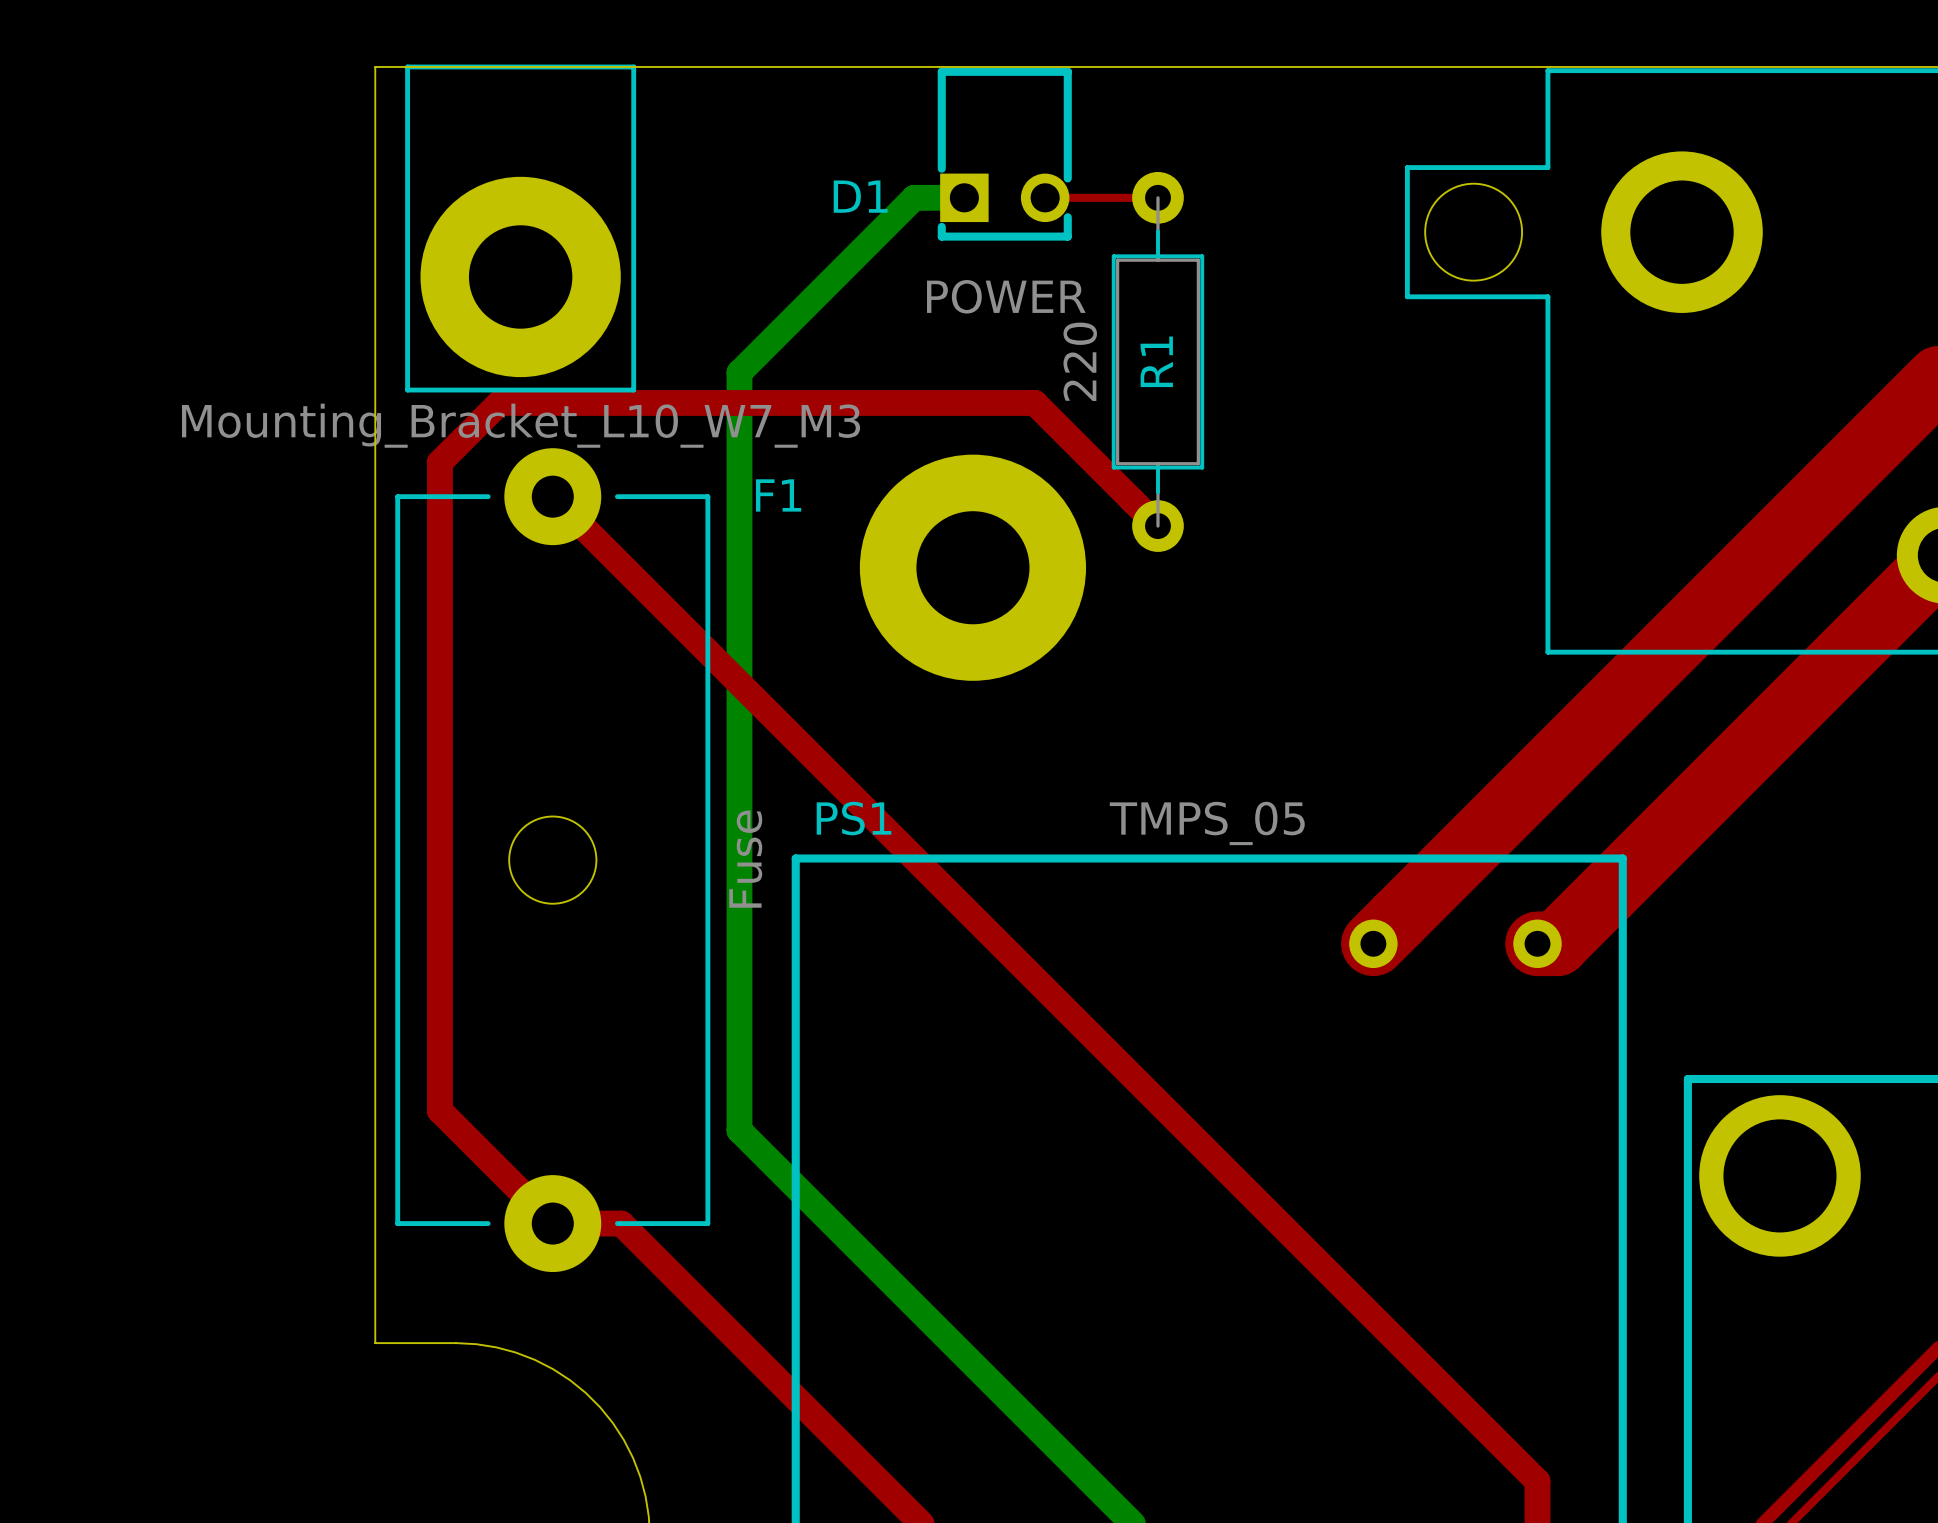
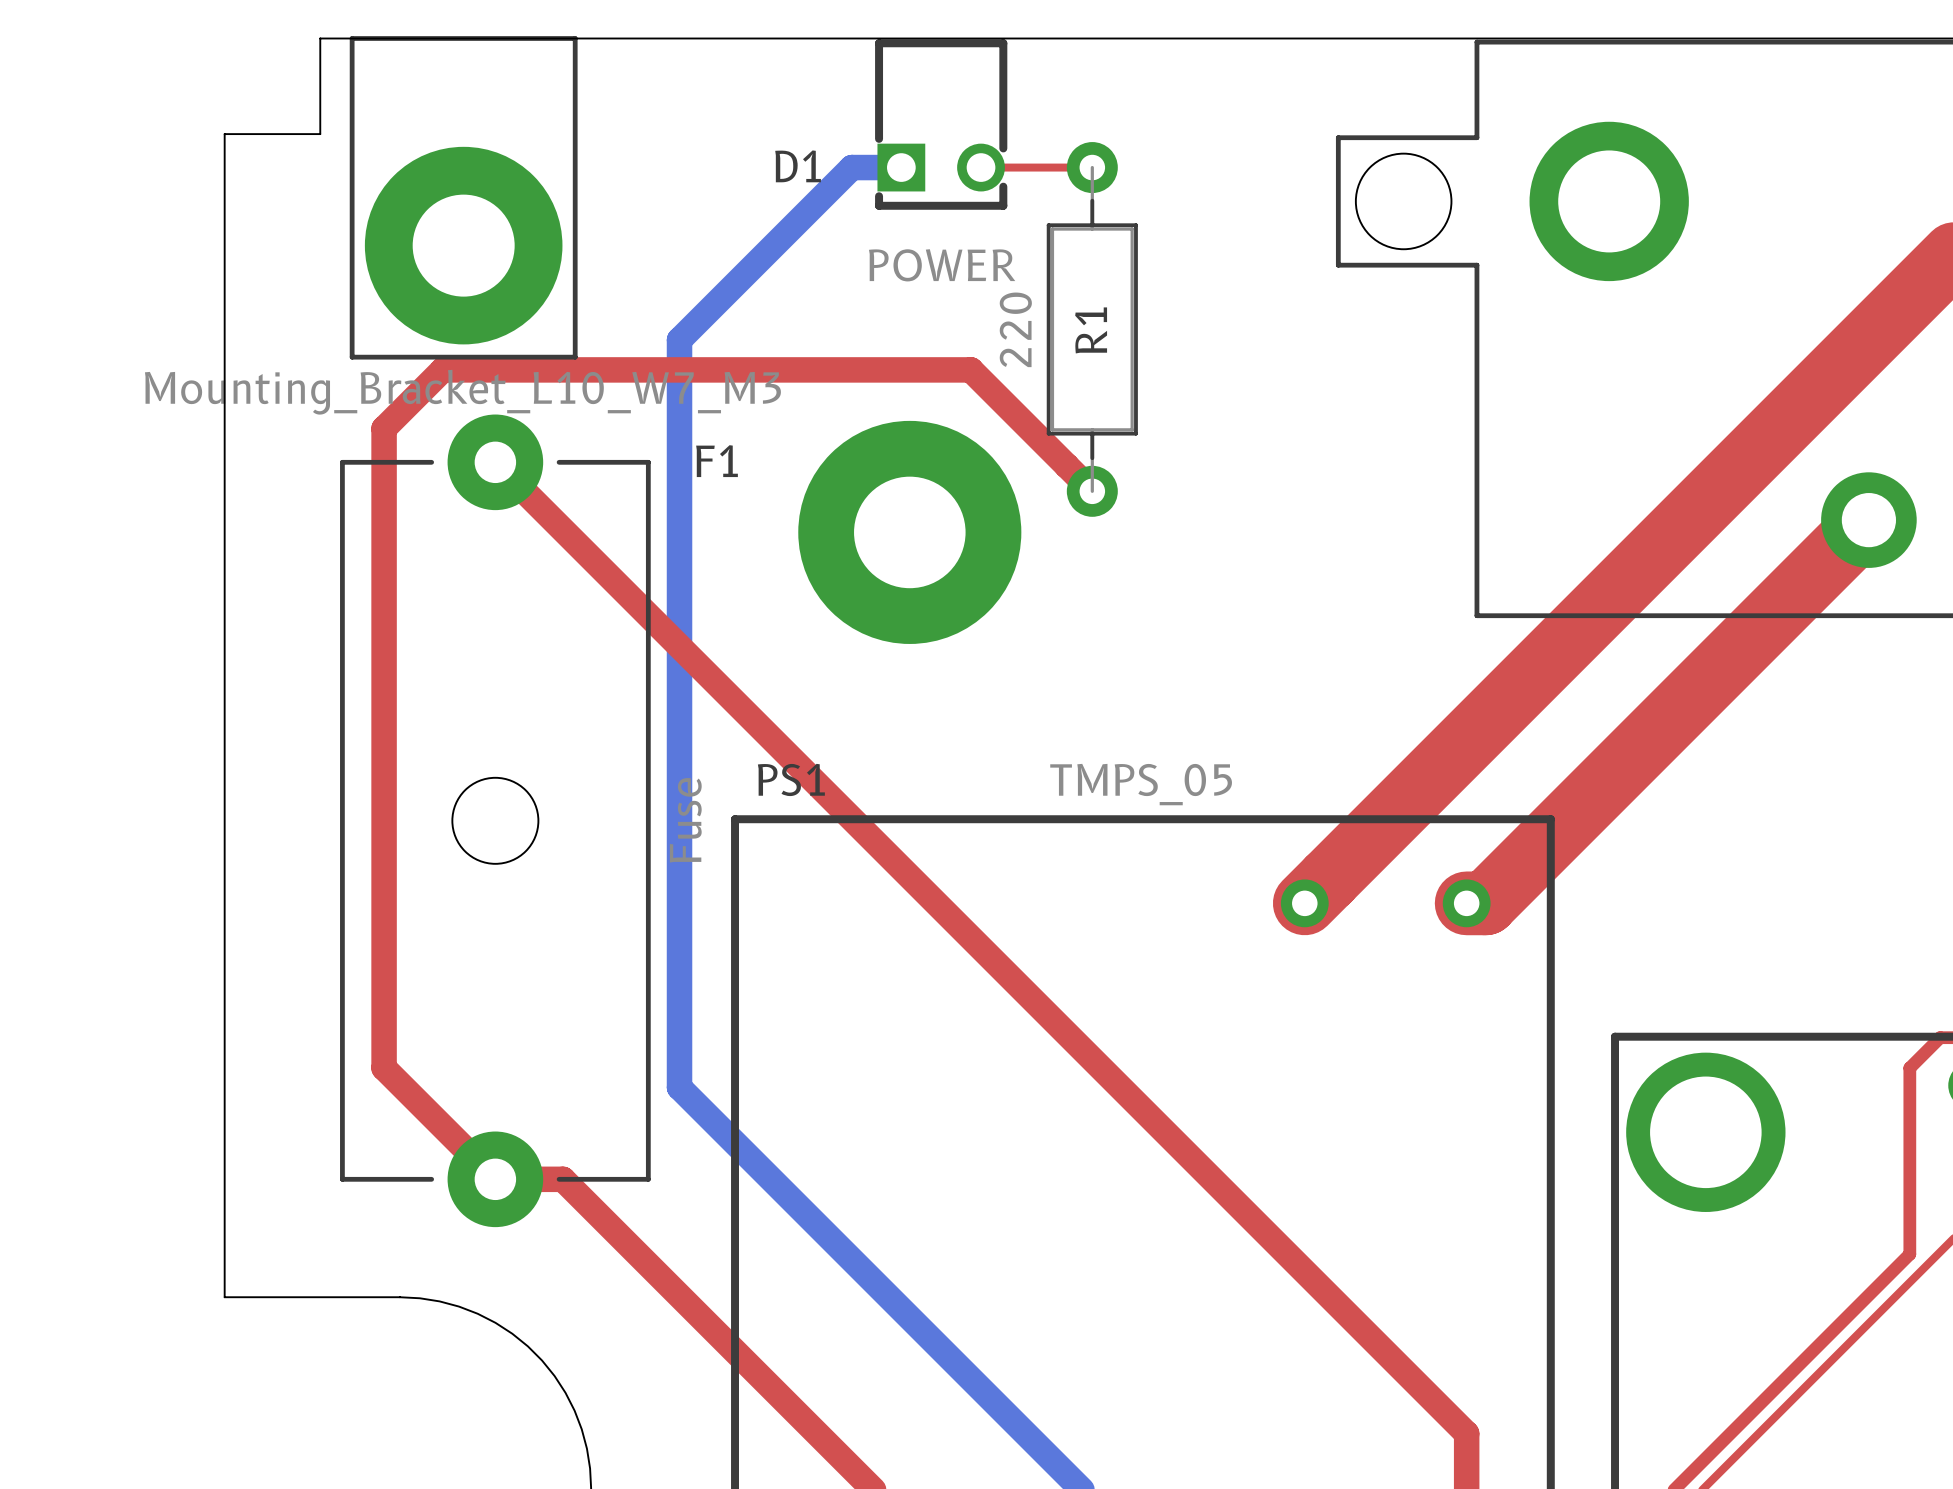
board edge: (375, 163) (375, 1343) -> (320, 134) (224, 134) (224, 1297) (320, 1297)

